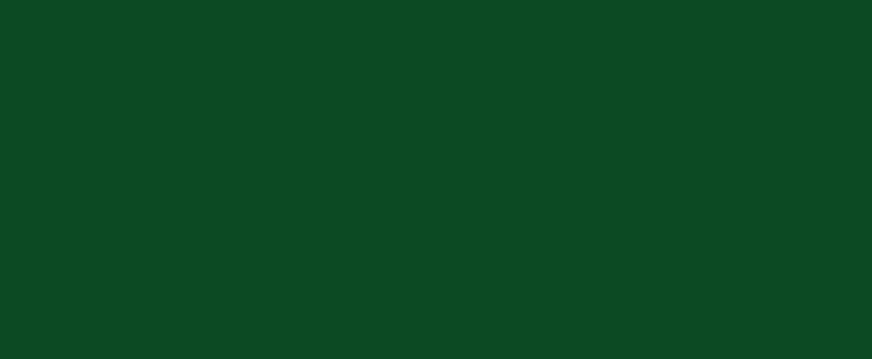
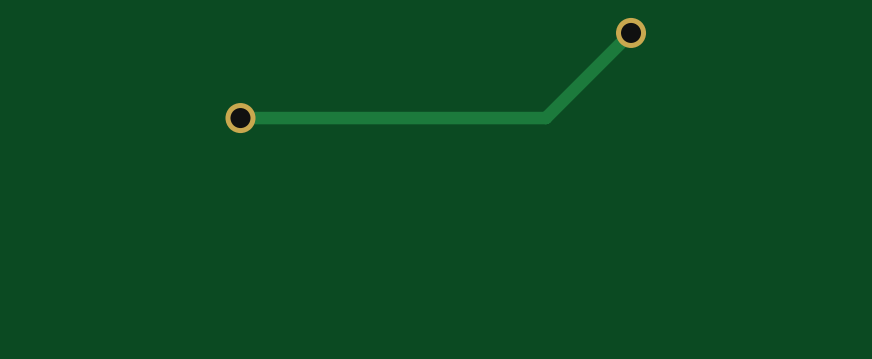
track: none -> (631, 32) (545, 118) (240, 118)
via: none -> (631, 32)
via: none -> (240, 118)

